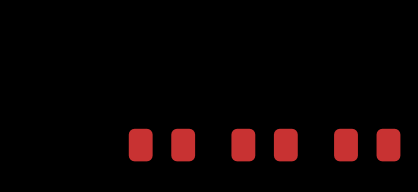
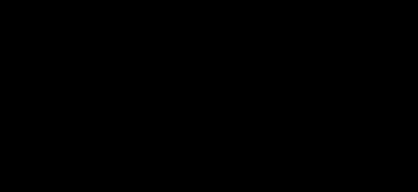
part: (161, 145) -> none
part: (264, 145) -> none
part: (367, 145) -> none

